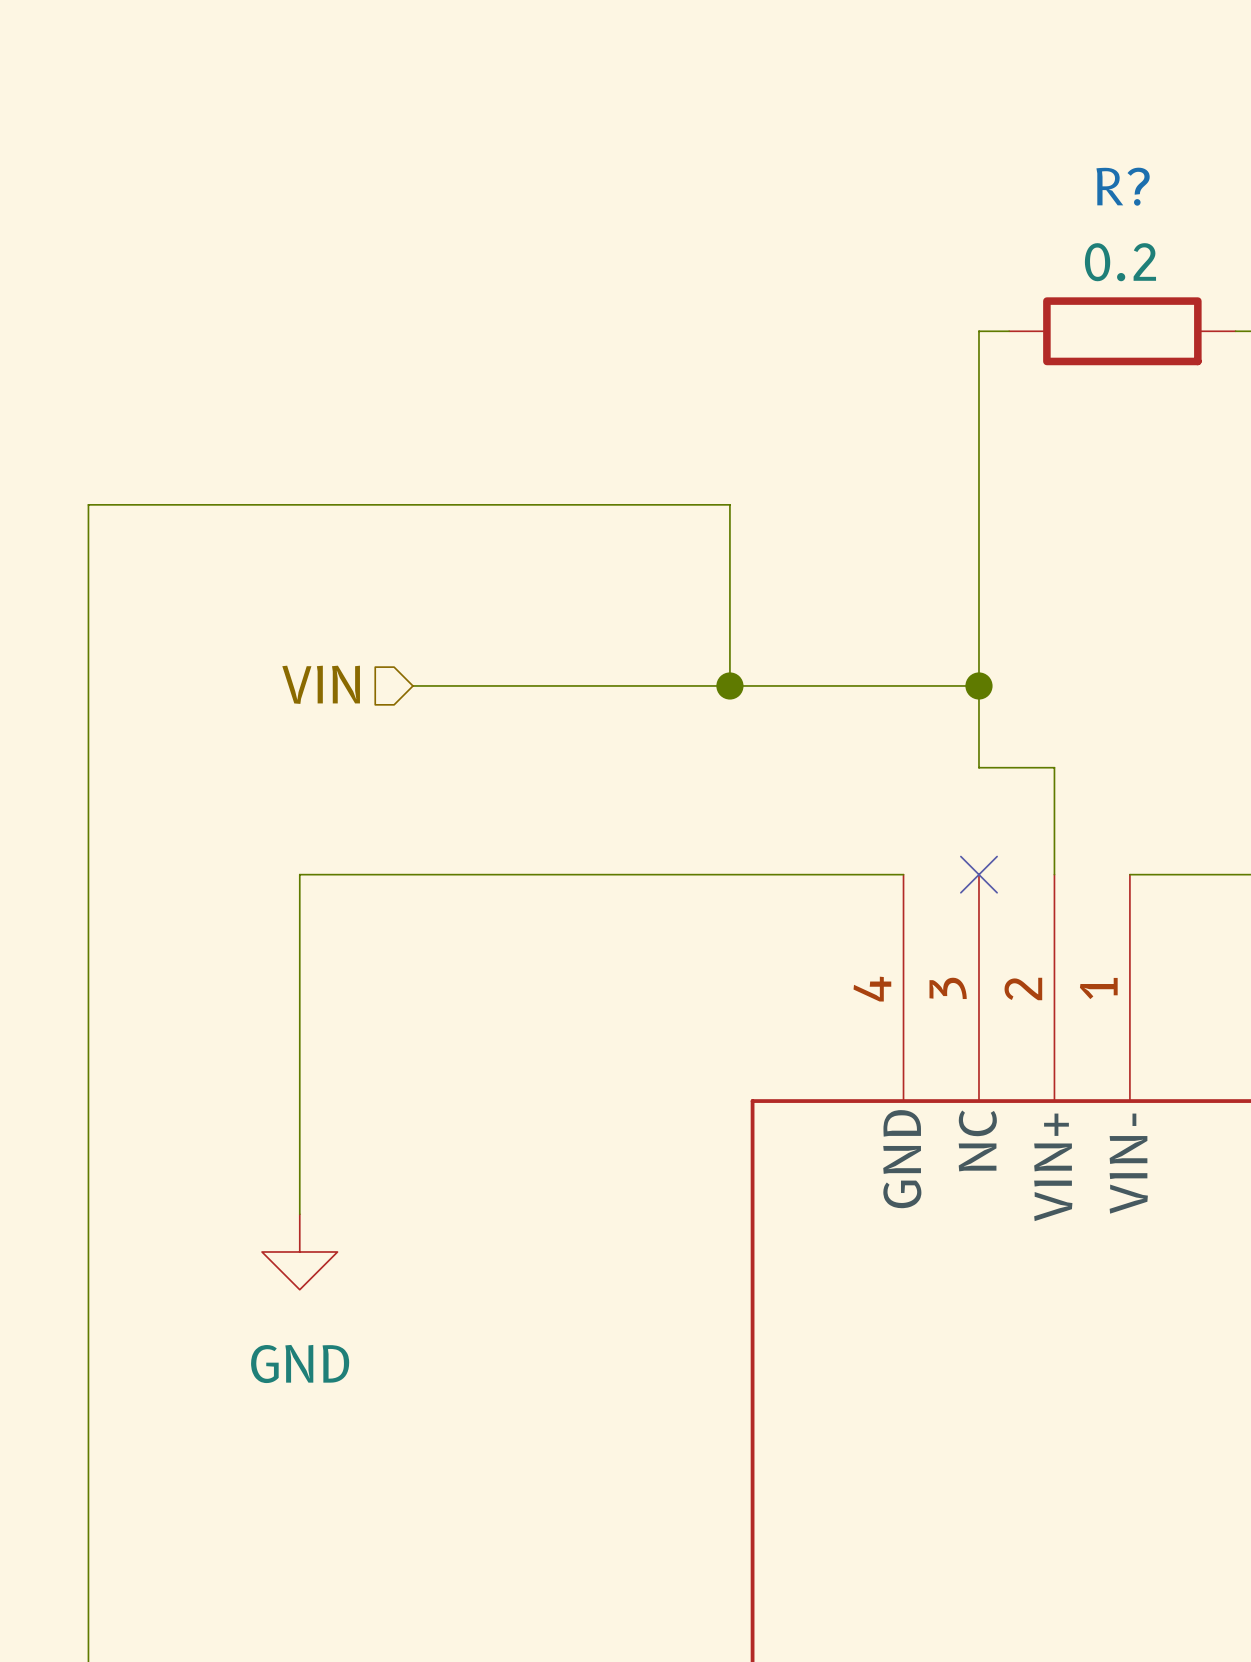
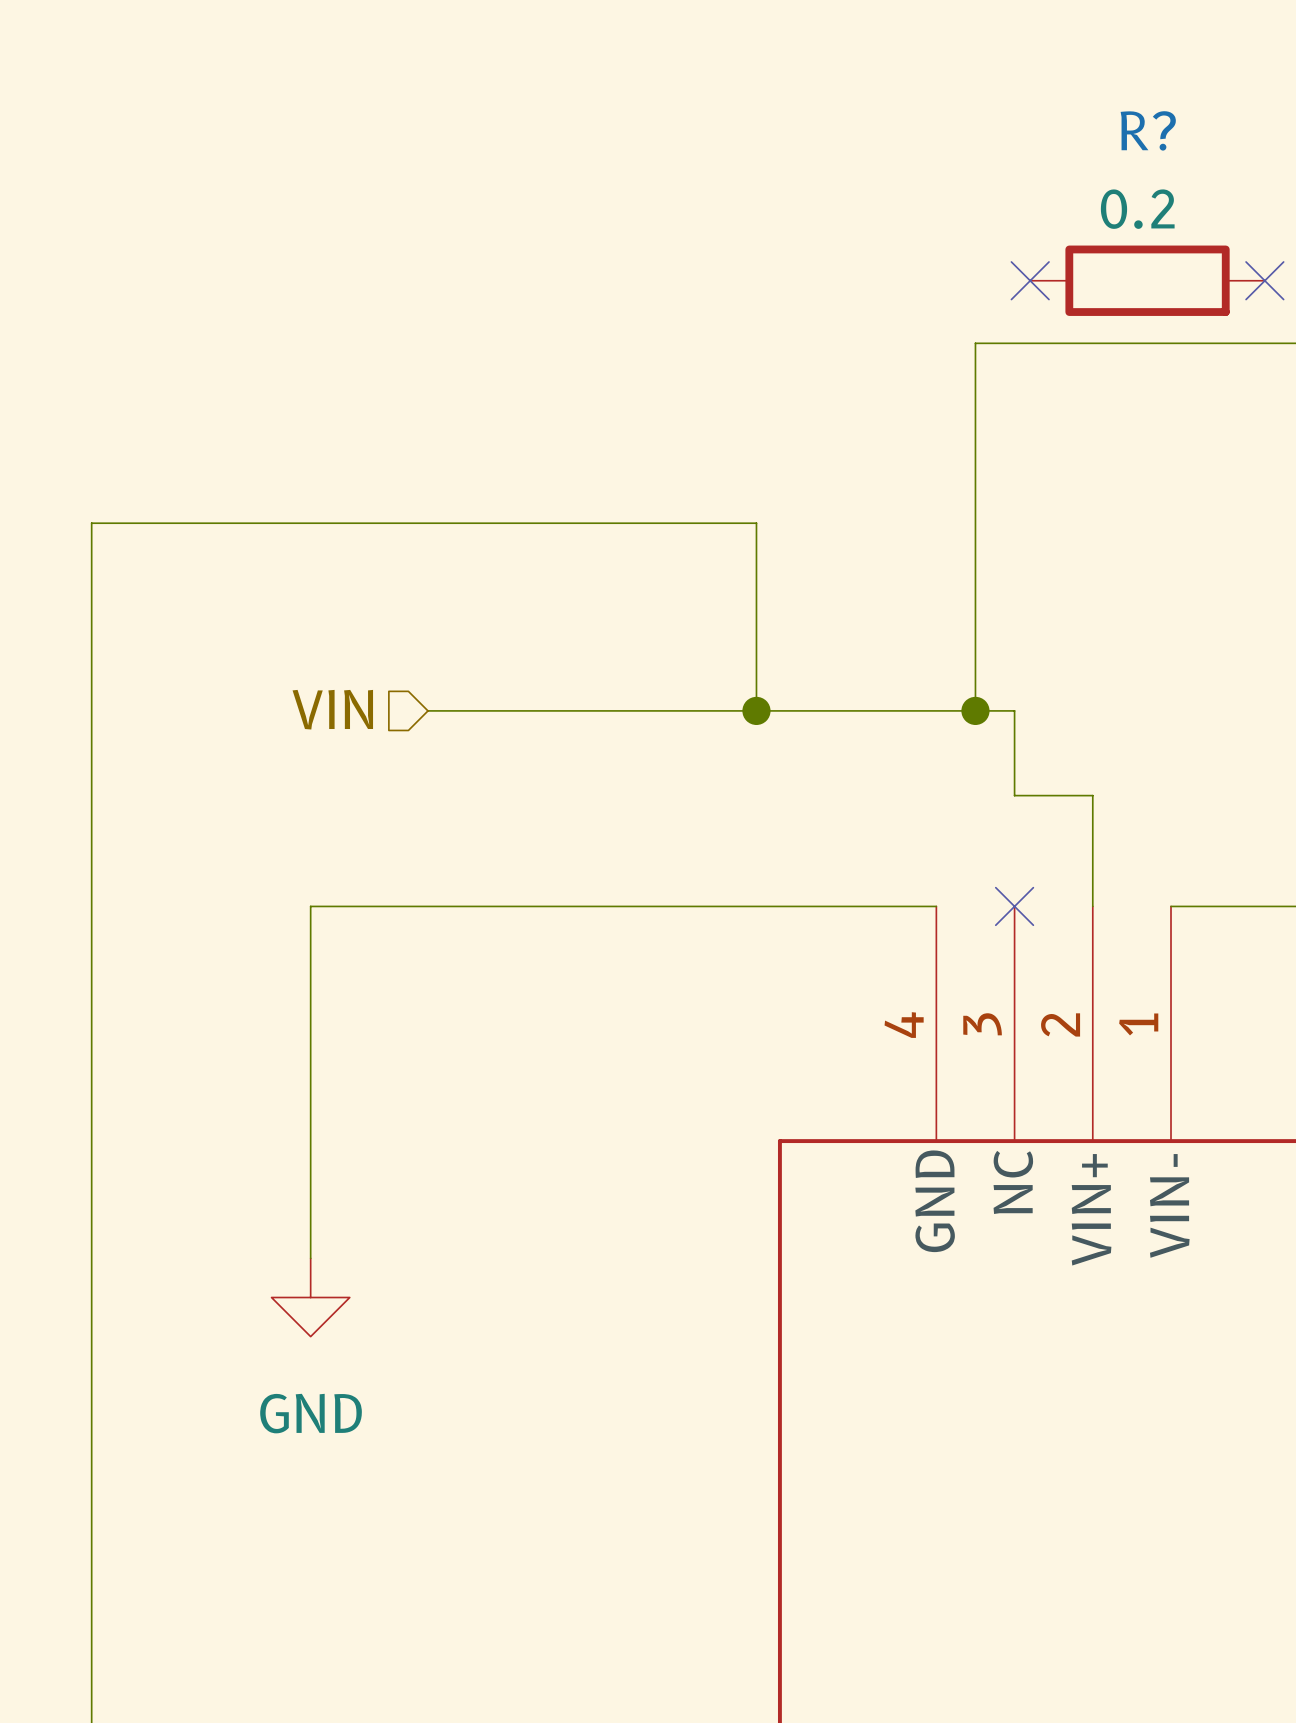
R? value position: 0.2 (1120, 262) -> 0.2 (1137, 209)
no-connect mark: none -> (1030, 280)
no-connect mark: none -> (1264, 280)
wire: (978, 331) (978, 685) -> (1014, 343) (975, 343) (975, 710)
wire: none -> (1045, 343) (1280, 343)
R? position: (1122, 331) -> (1147, 280)
junction position: (978, 685) -> (975, 710)

